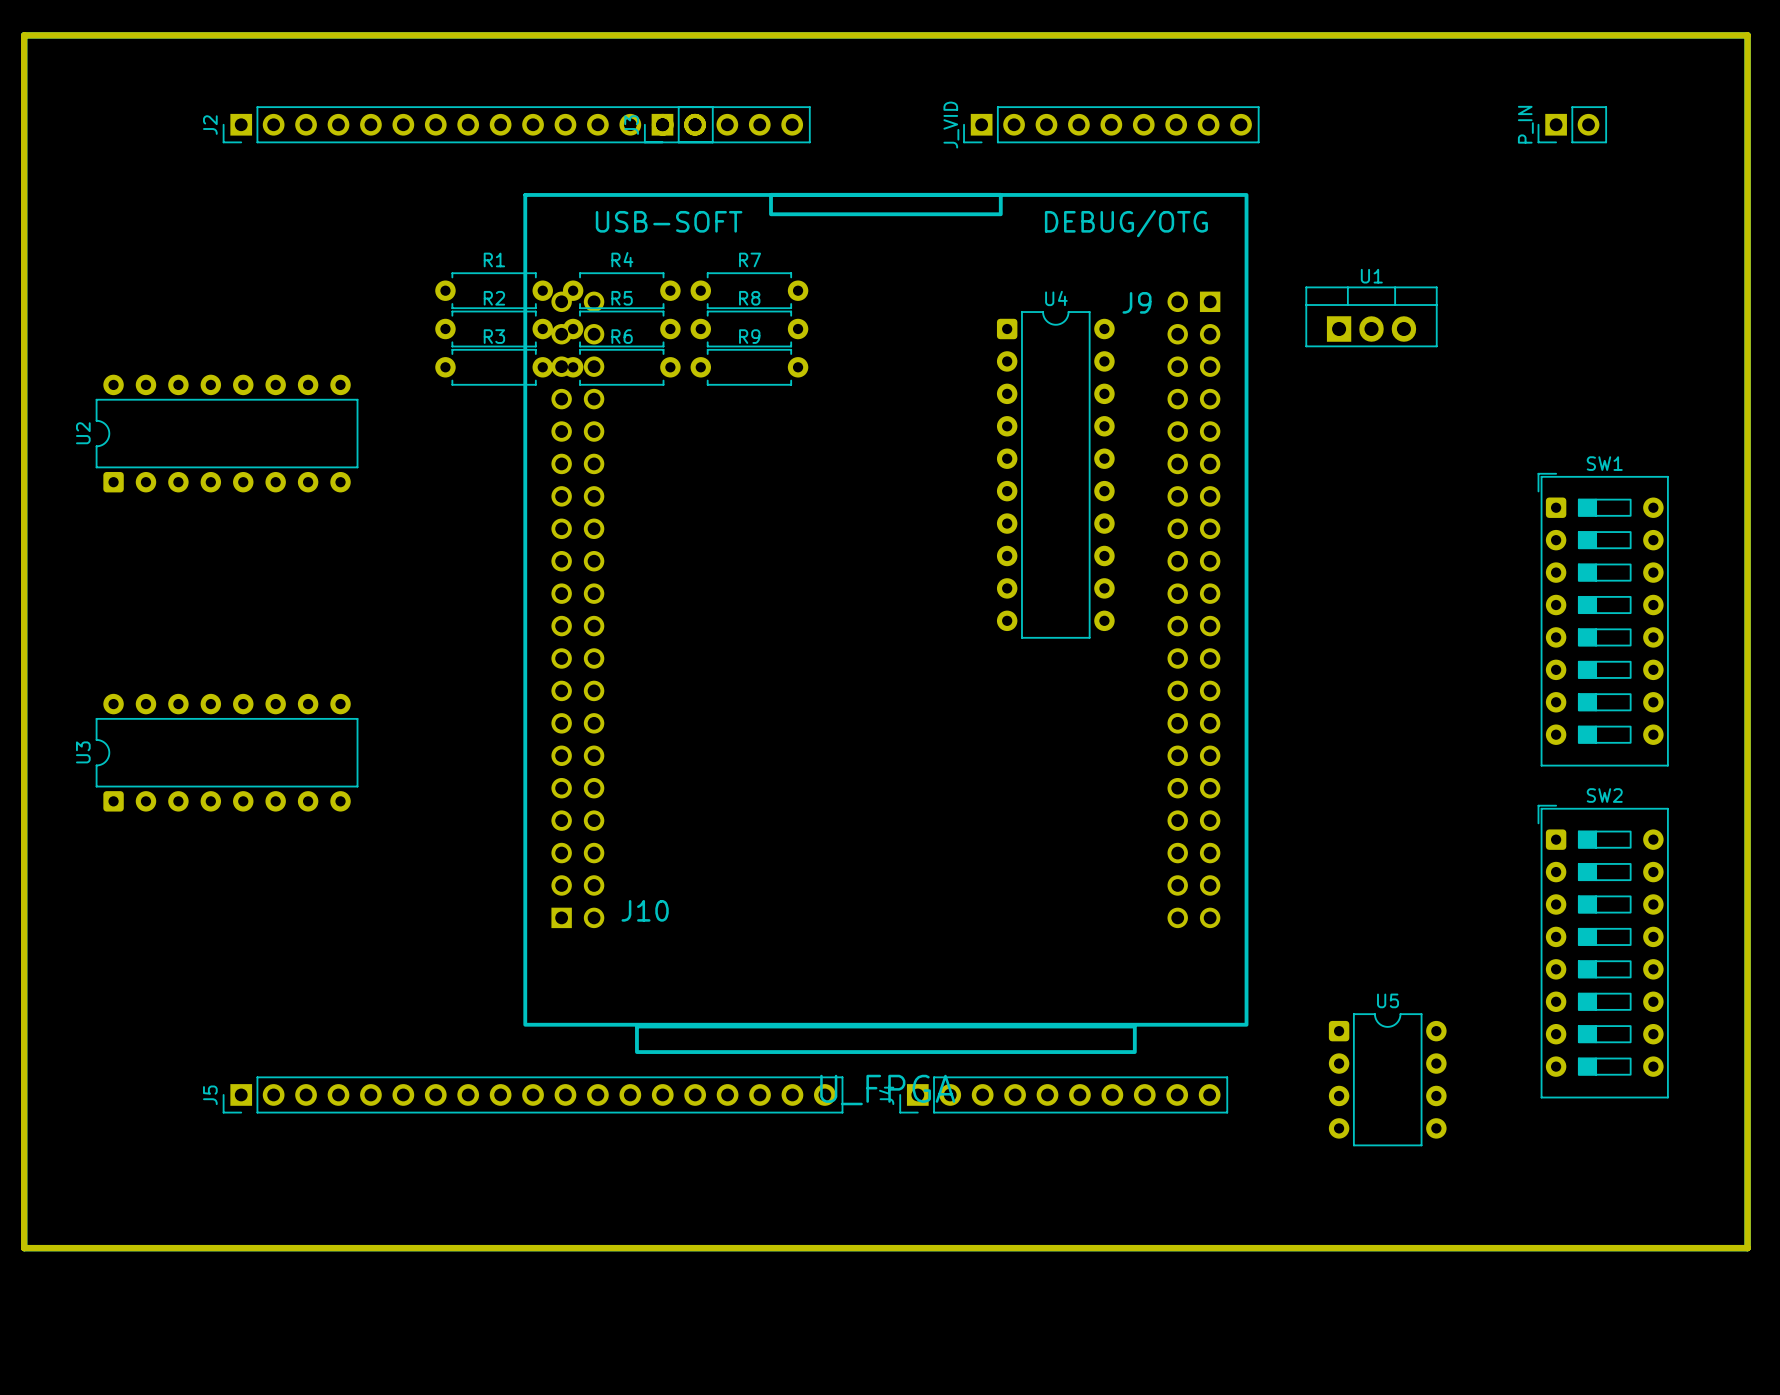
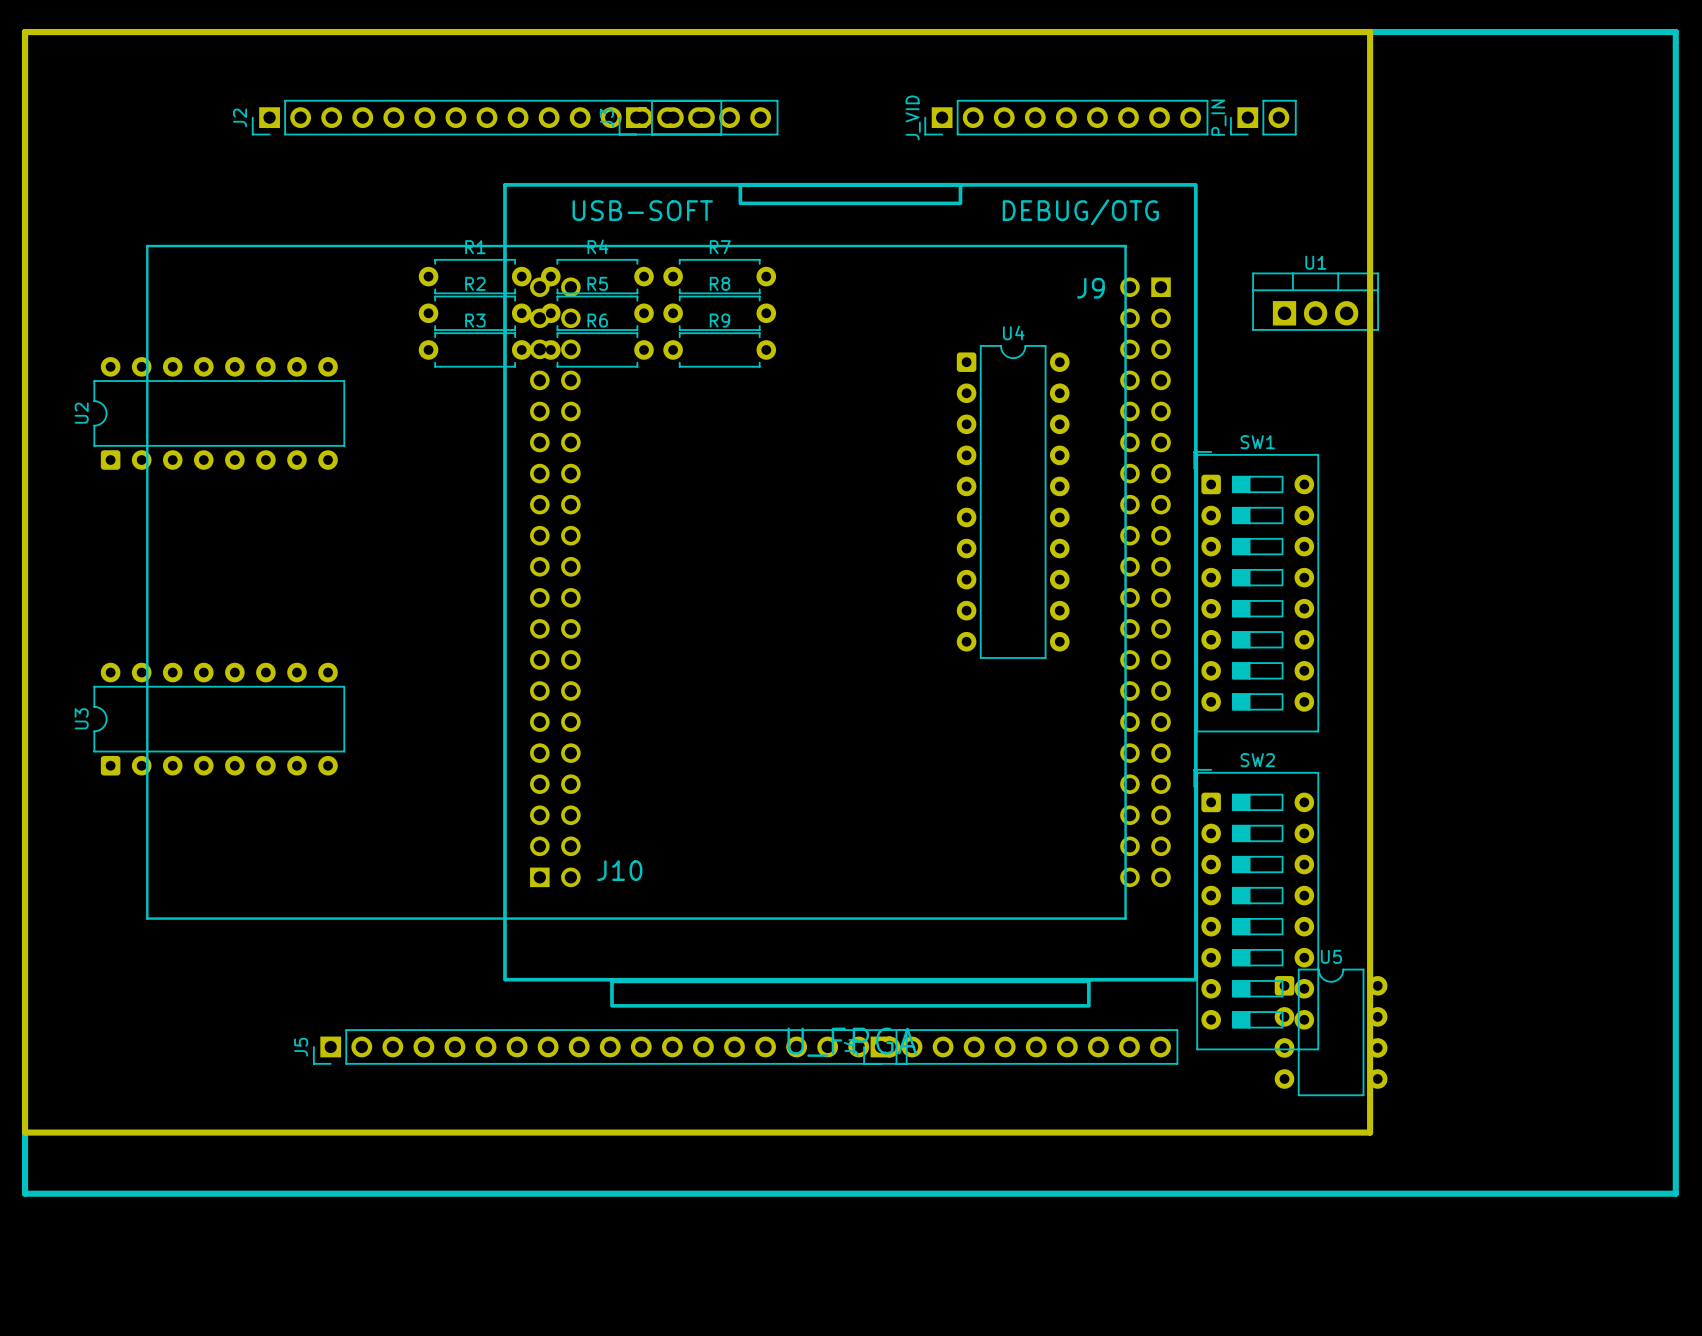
board edge: (1428, 35) (1747, 35) (1747, 1248) (24, 1248) (24, 1184) -> (1370, 32) (1370, 1132) (25, 1132)
J2 position: (468, 124) -> (486, 117)
P_IN position: (1572, 124) -> (1263, 117)
line: none -> (147, 246) (1125, 246) (1125, 918) (147, 918) (147, 246)
U4 position: (1055, 474) -> (1013, 501)
SW1 position: (1603, 619) -> (1256, 591)
SW2 position: (1603, 951) -> (1256, 909)
J5 position: (533, 1094) -> (610, 1046)

